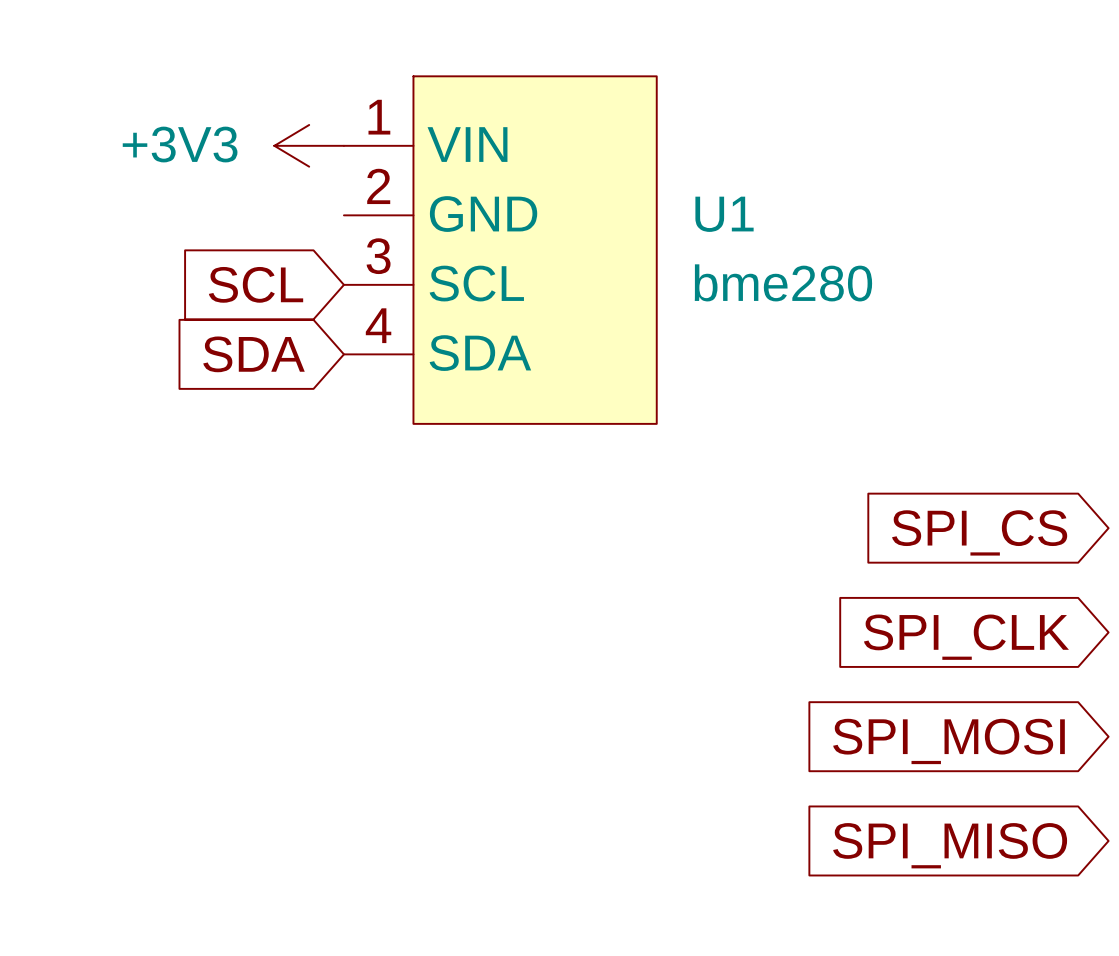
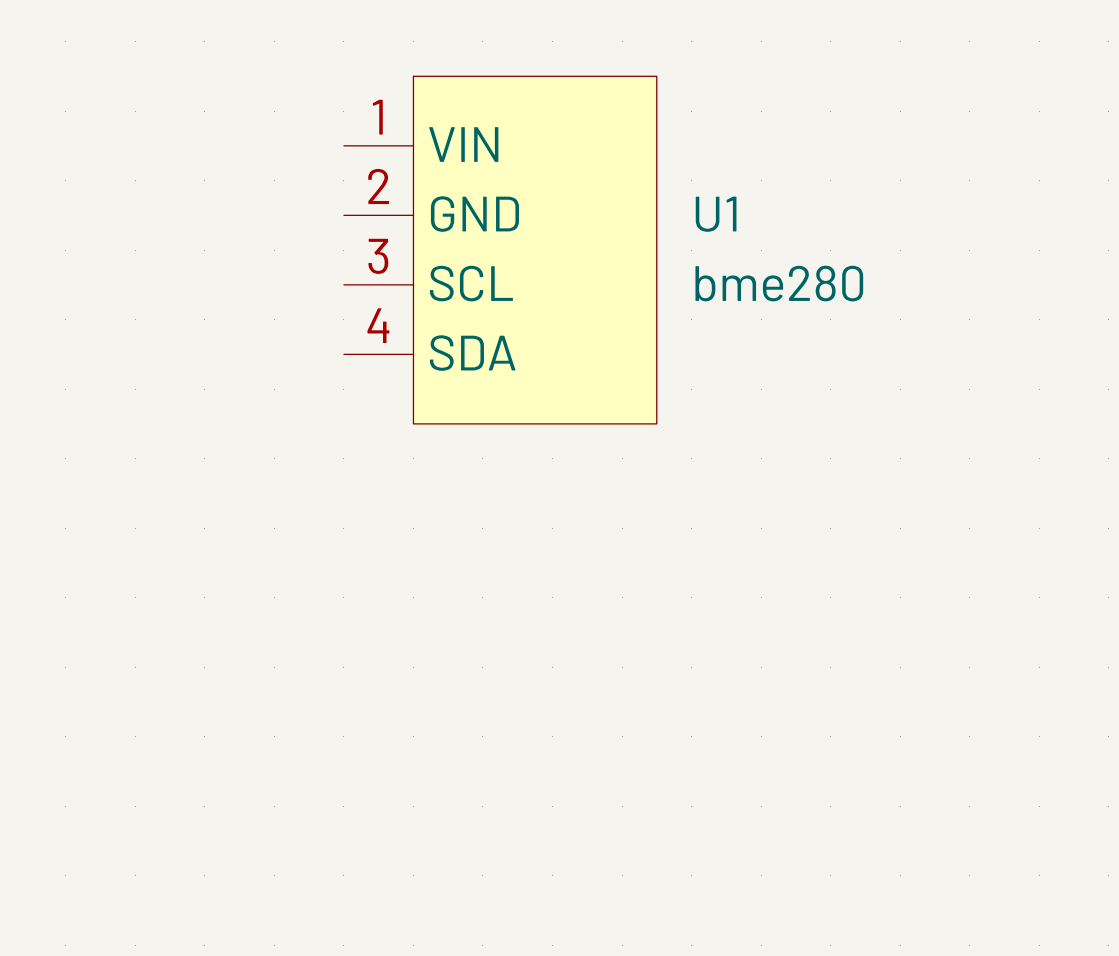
power symbol: +3V3 (309, 145) -> none
global label: SCL (256, 284) -> none
global label: SDA (254, 354) -> none
global label: SPI_CS (979, 532) -> none
global label: SPI_CLK (966, 637) -> none
global label: SPI_MOSI (948, 741) -> none
global label: SPI_MISO (950, 845) -> none

